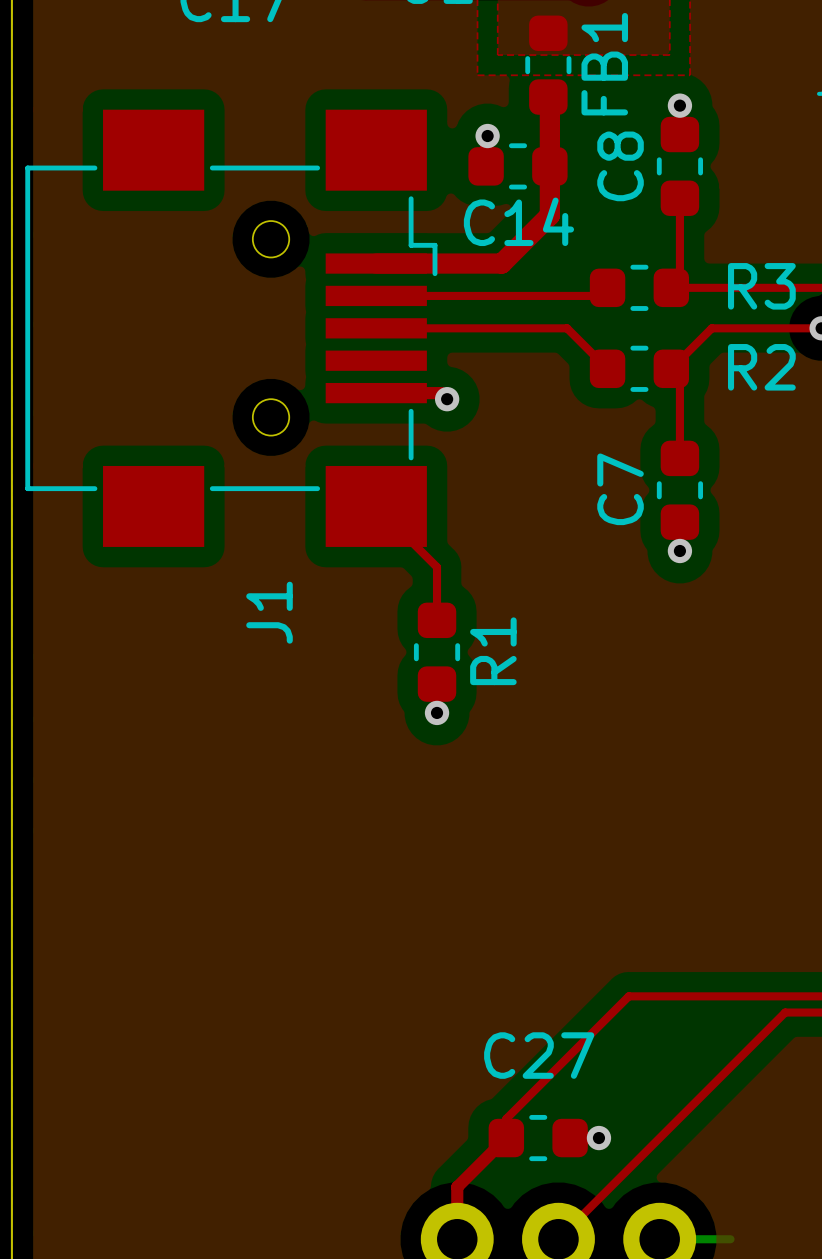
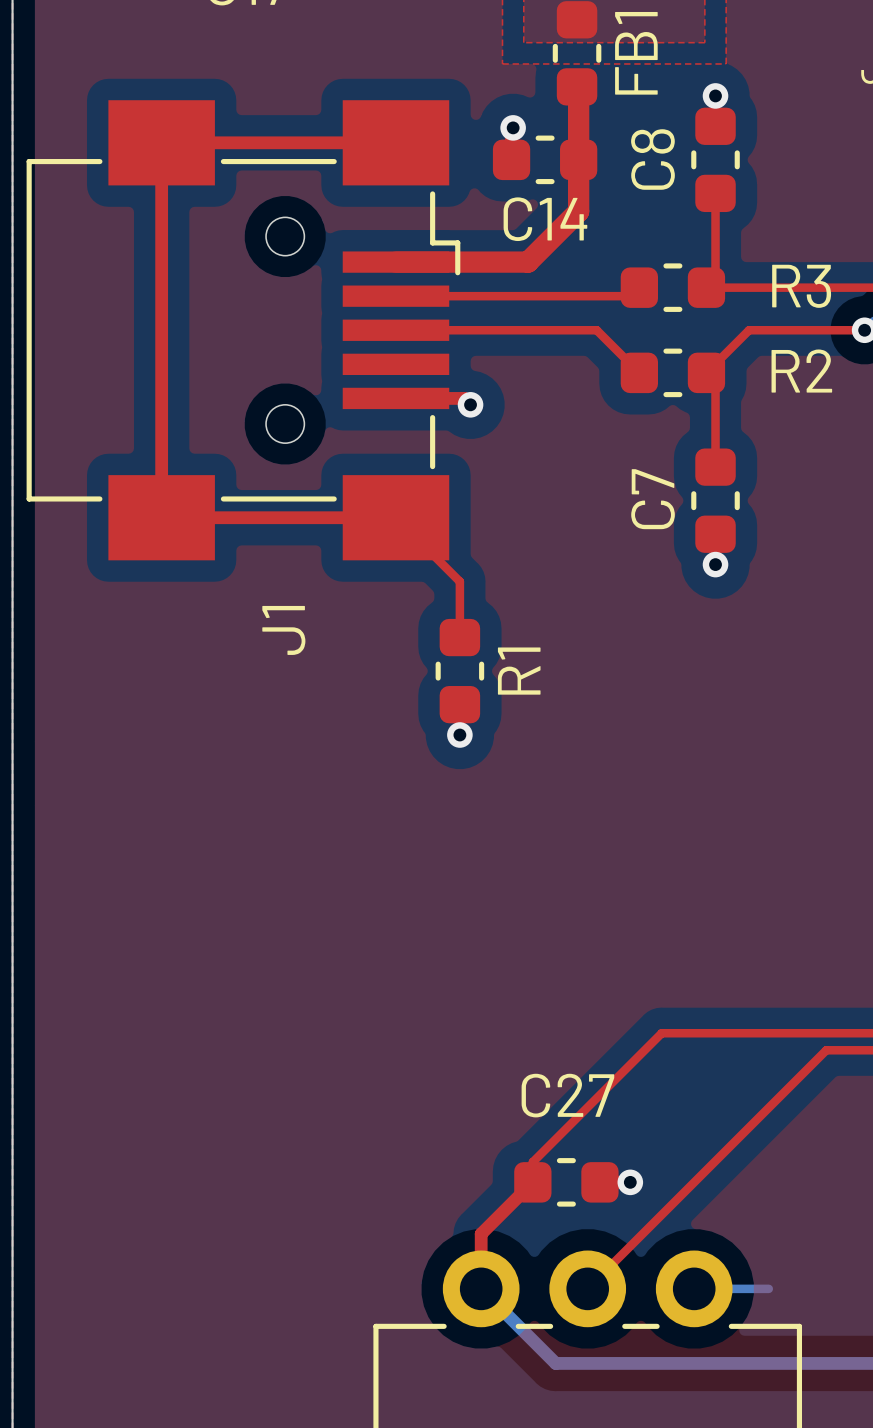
top track: none -> (395, 142) (161, 142) (161, 517) (395, 517)

